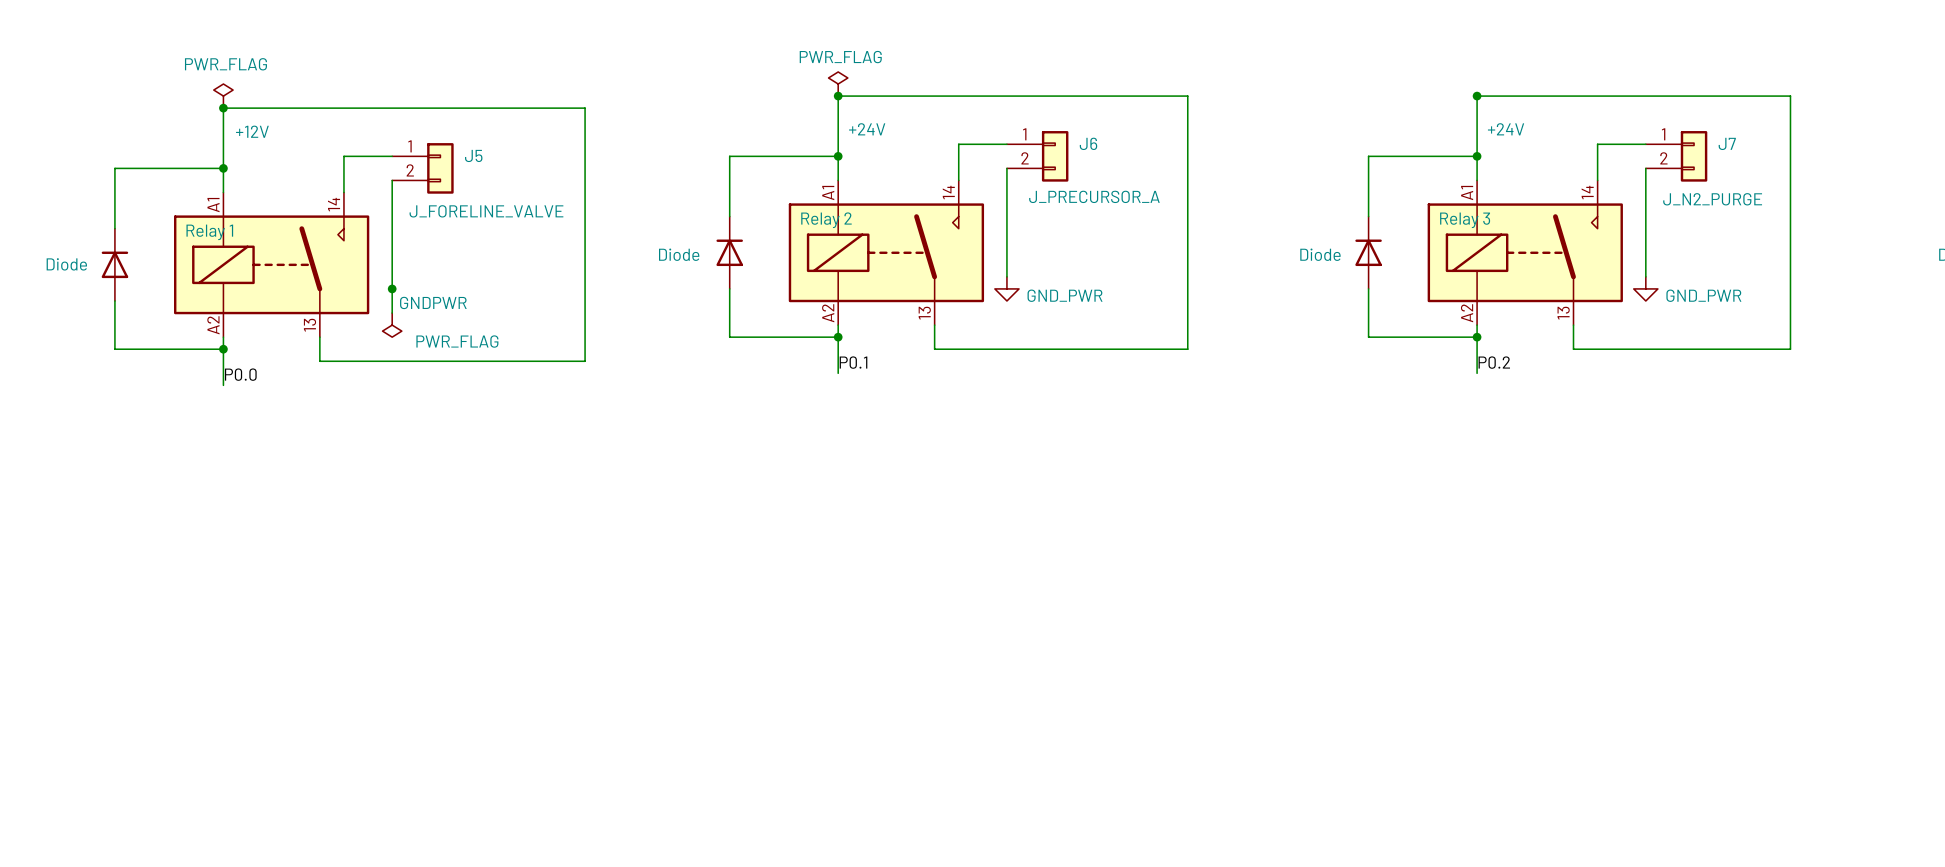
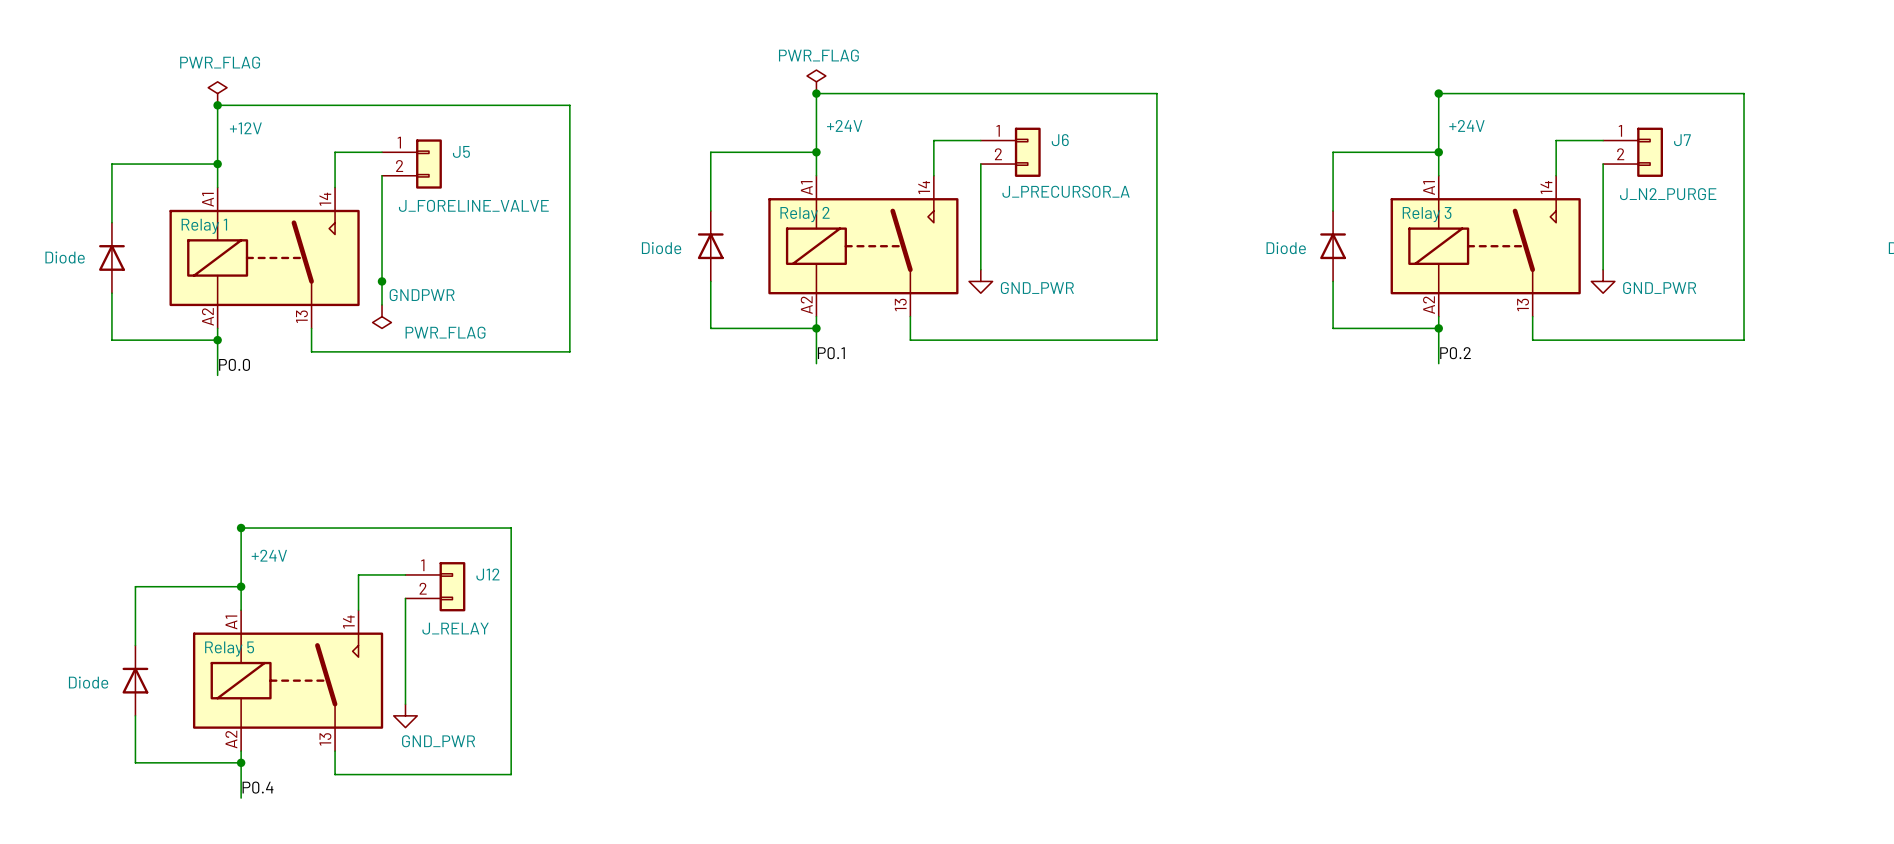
junction: none -> (241, 528)
power symbol: none -> +24V (269, 555)
wire: none -> (405, 574) (358, 574) (358, 610)
wire: none -> (241, 586) (135, 586) (135, 645)
junction: none -> (241, 586)
J12: none -> J_RELAY (435, 586)
wire: none -> (405, 598) (405, 704)
wire: none -> (241, 610) (241, 528) (511, 528) (511, 774) (335, 774) (335, 751)
part: none -> Diode (135, 680)
part: none -> Relay 5 (288, 680)
wire: none -> (135, 715) (135, 762) (241, 762)
power symbol: none -> GND_PWR (405, 715)
wire: none -> (241, 751) (241, 798)
junction: none -> (241, 762)
label: none -> P0.4 (257, 787)

